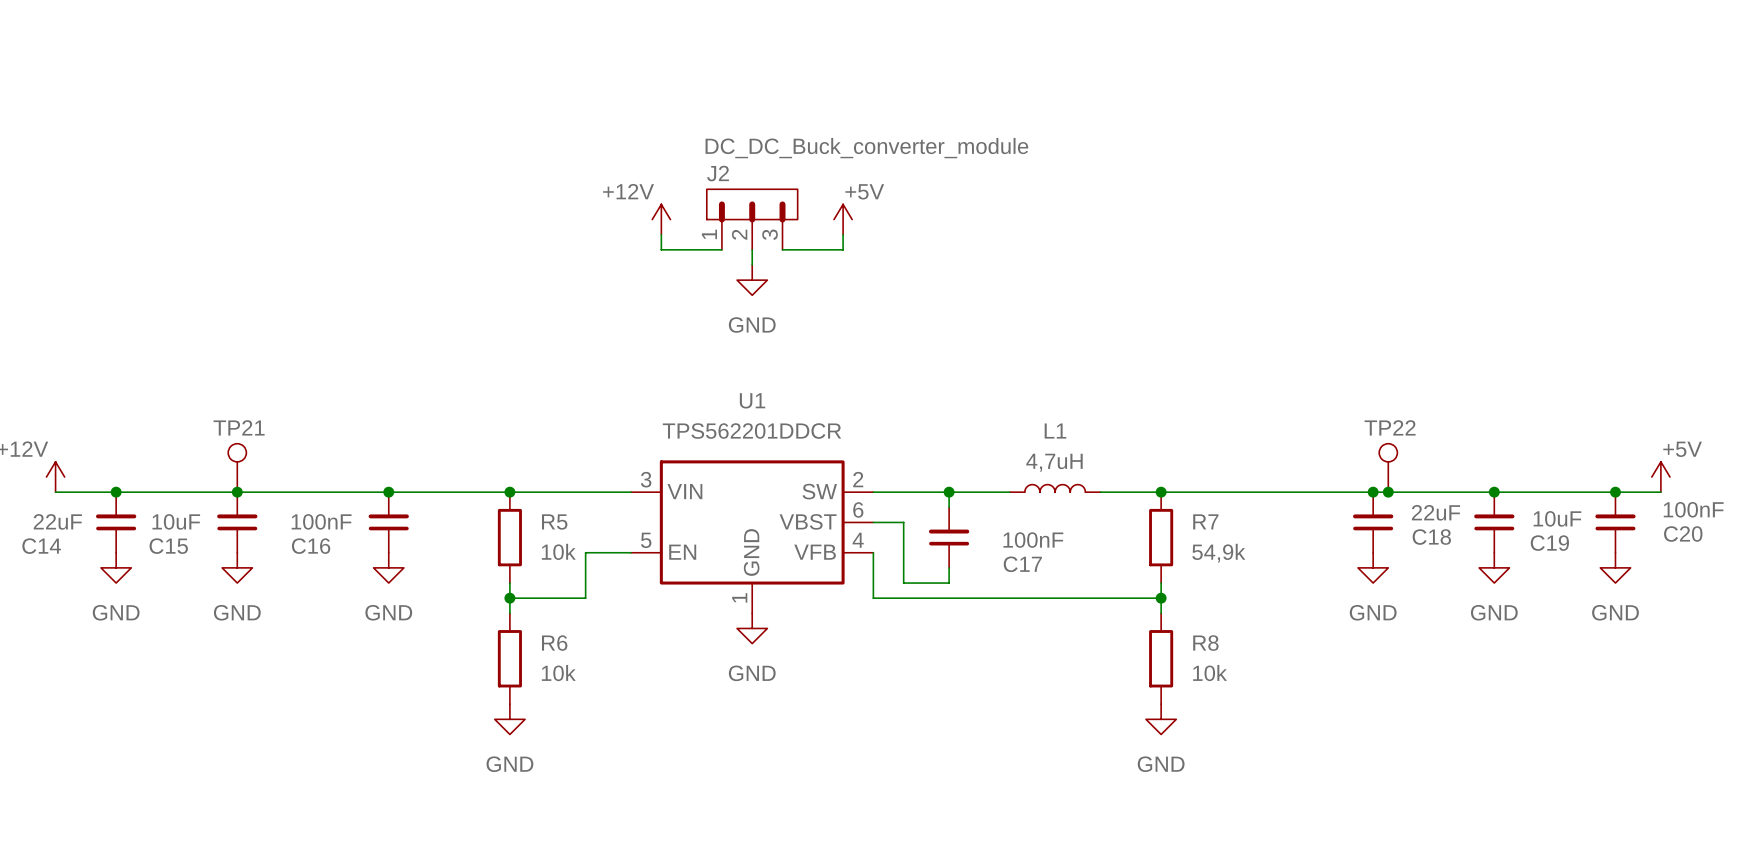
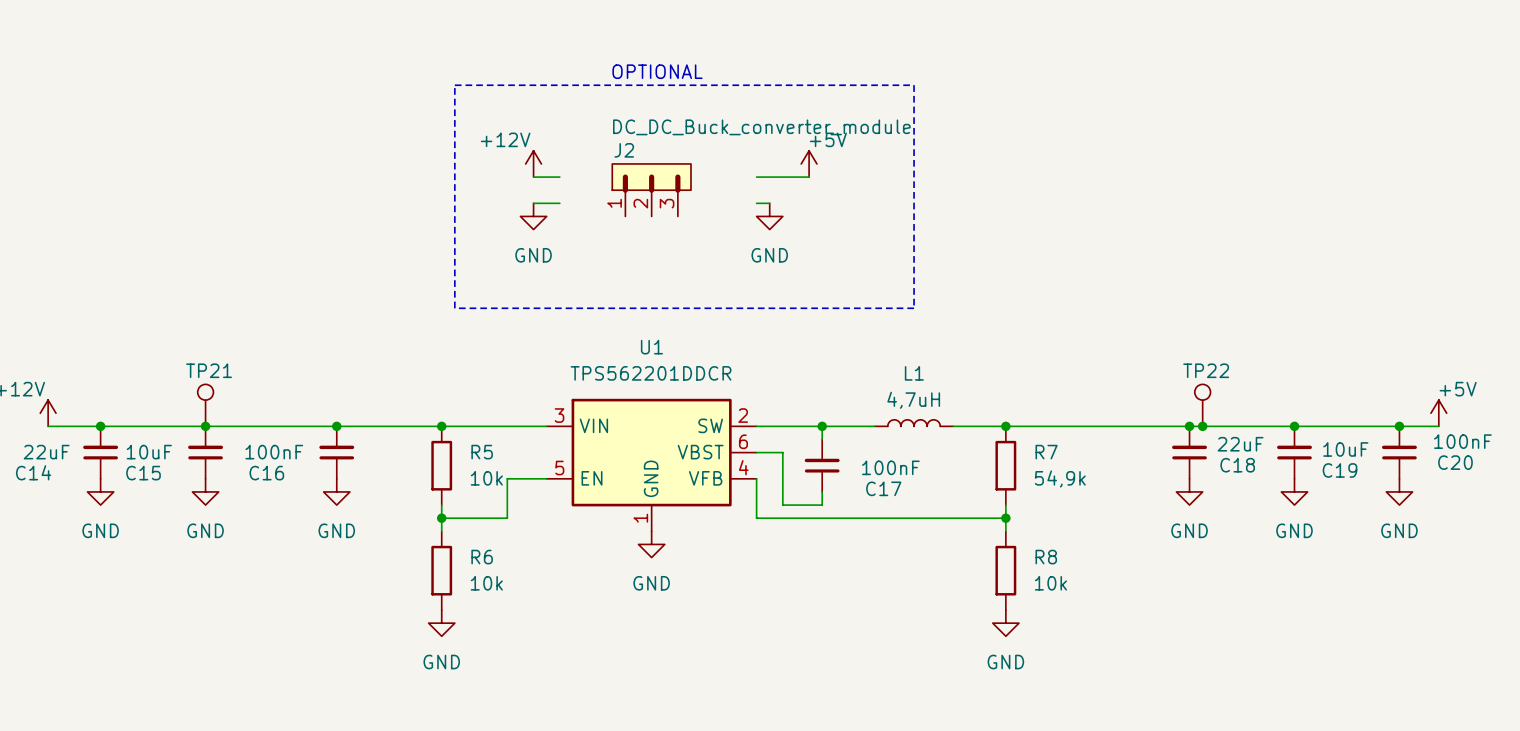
text: none -> OPTIONAL (657, 71)
line: none -> (454, 85) (914, 85) (914, 308) (454, 308) (454, 85)
wire: none -> (533, 177) (559, 177)
wire: none -> (756, 177) (809, 177)
power symbol position: +12V (661, 219) -> +12V (533, 163)
power symbol position: +5V (843, 219) -> +5V (809, 163)
wire: none -> (533, 203) (559, 203)
wire: (661, 234) (661, 249) (721, 249) -> none
wire: (843, 234) (843, 249) (782, 249) -> none
wire: none -> (756, 203) (769, 203)
power symbol: none -> GND (533, 216)
wire: (752, 249) (752, 265) -> none
power symbol: none -> GND (769, 216)
power symbol: GND (752, 280) -> none

